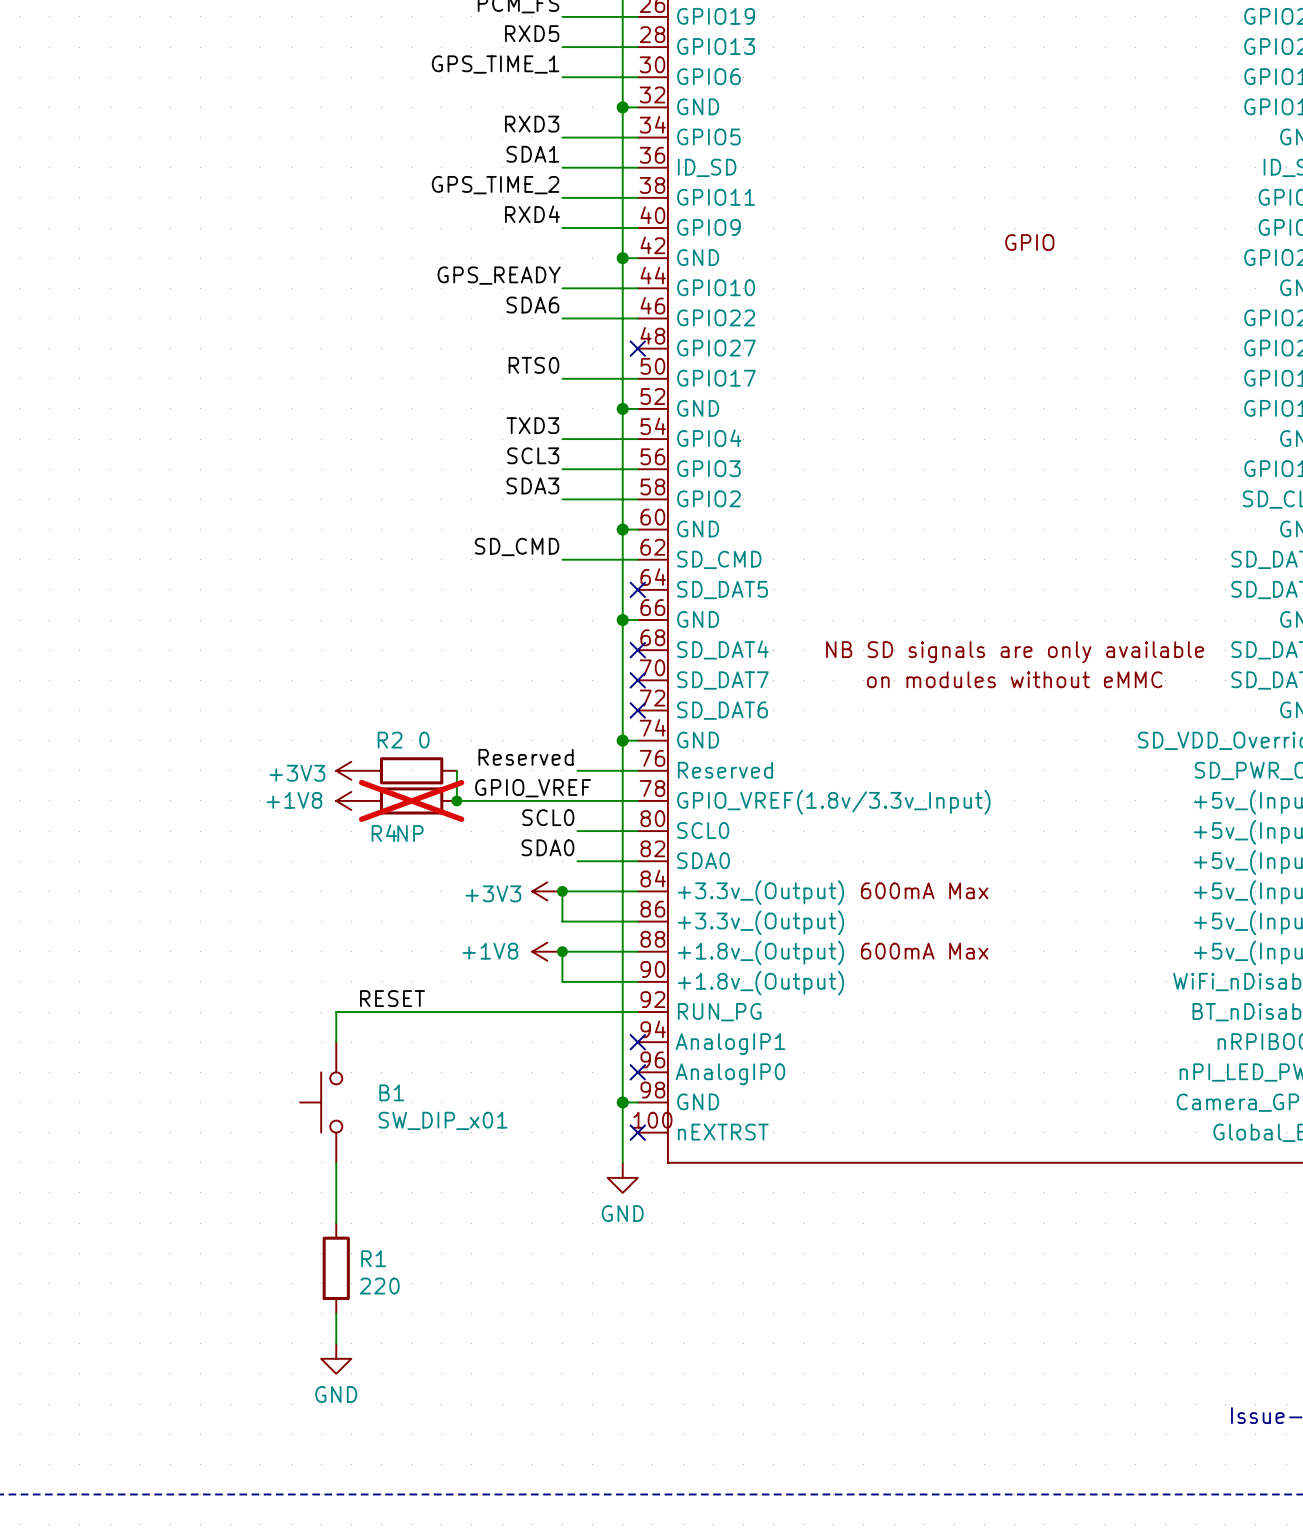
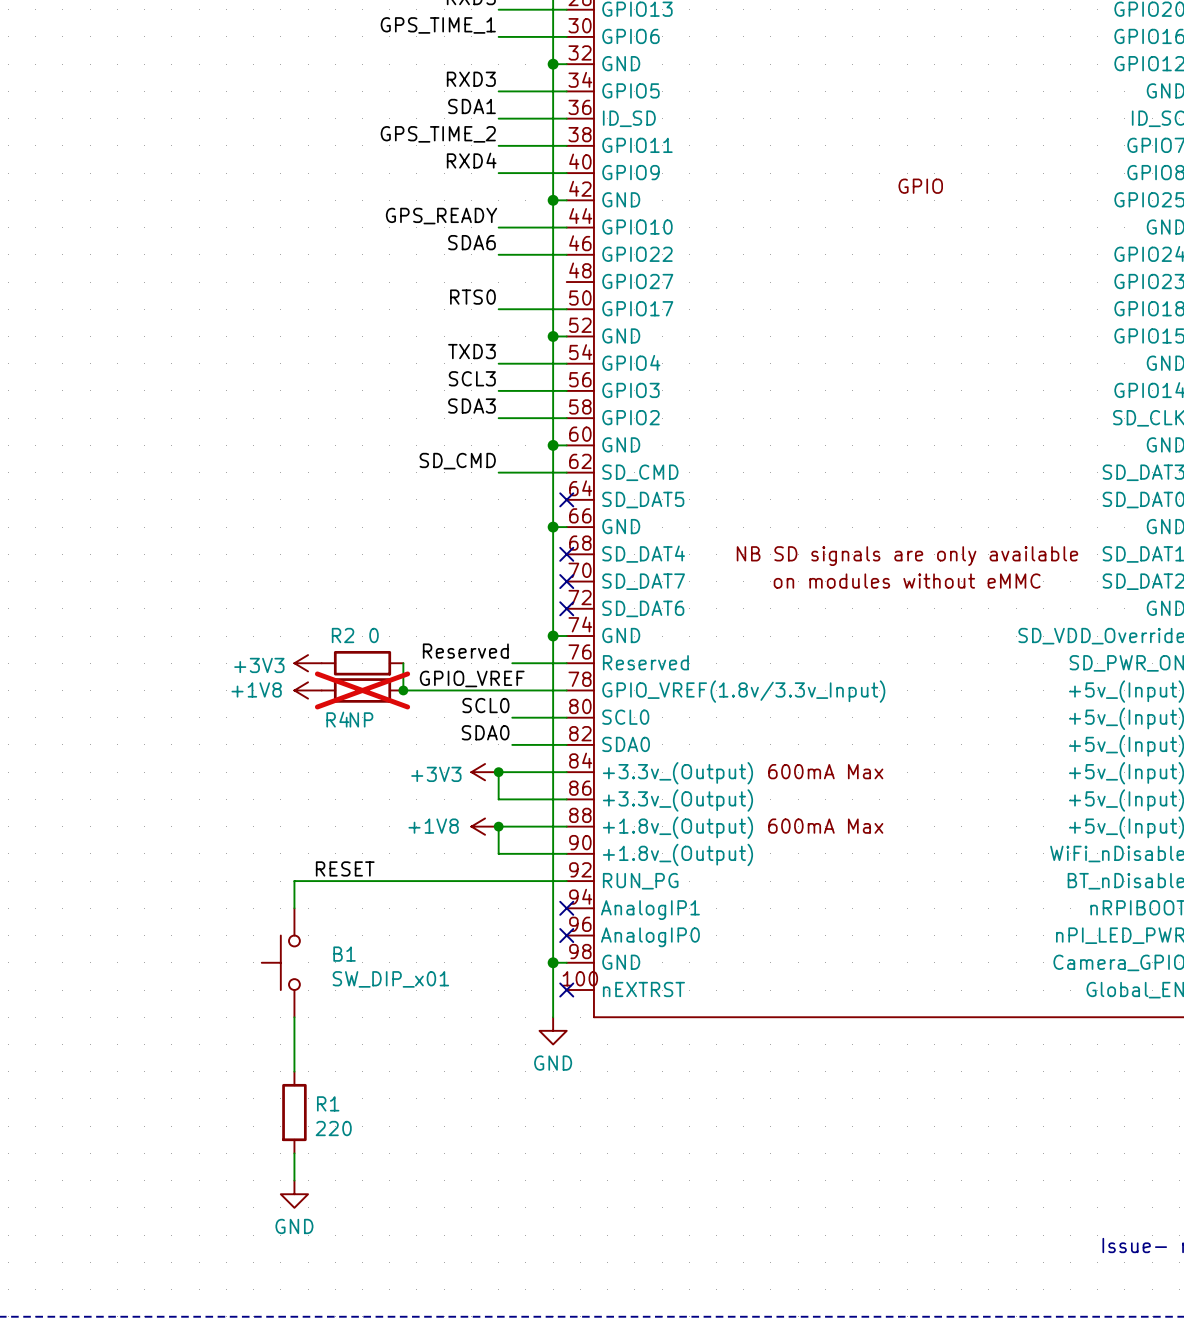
no-connect mark: (637, 348) -> none

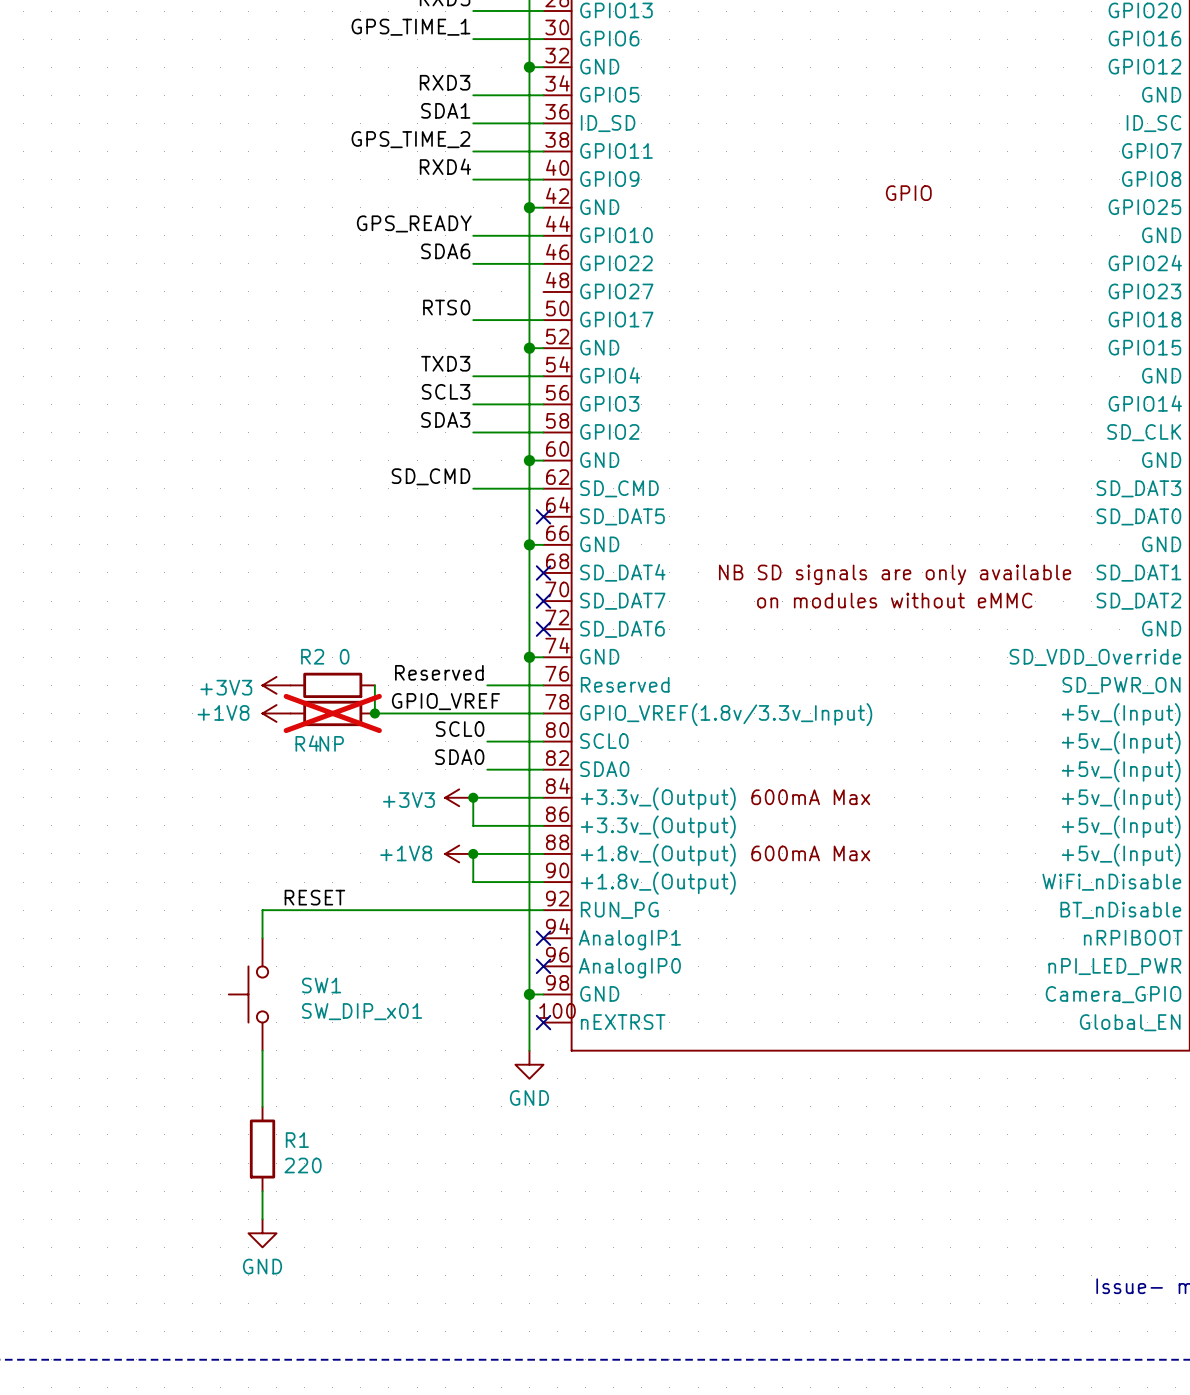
B1 name: B1 (344, 954) -> SW1 (321, 985)

